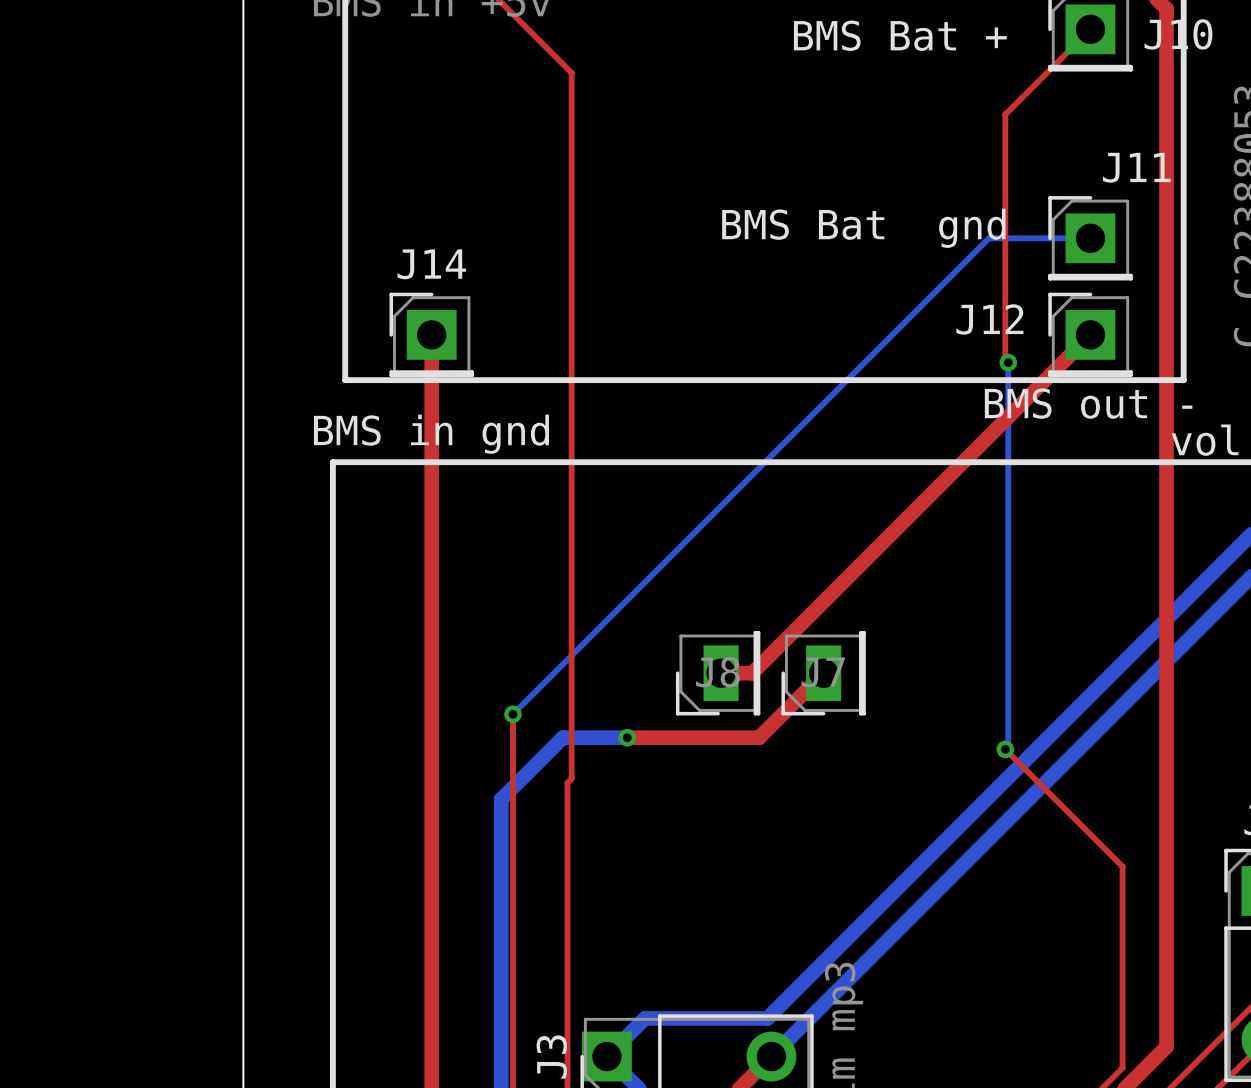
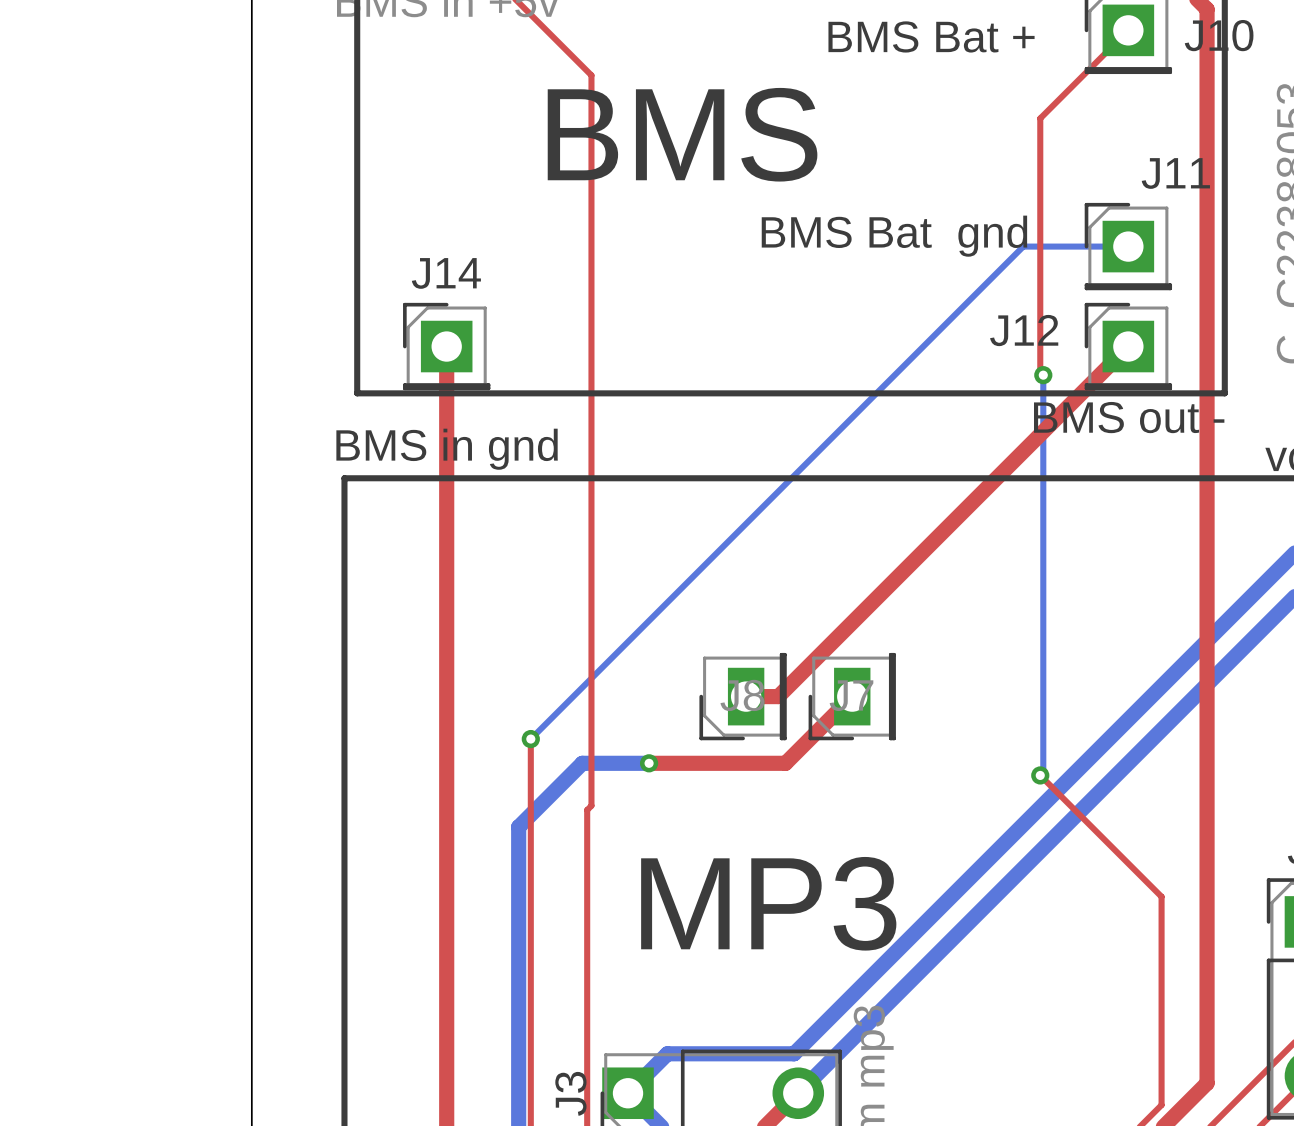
text: none -> BMS (682, 134)
text: none -> MP3 (768, 903)

